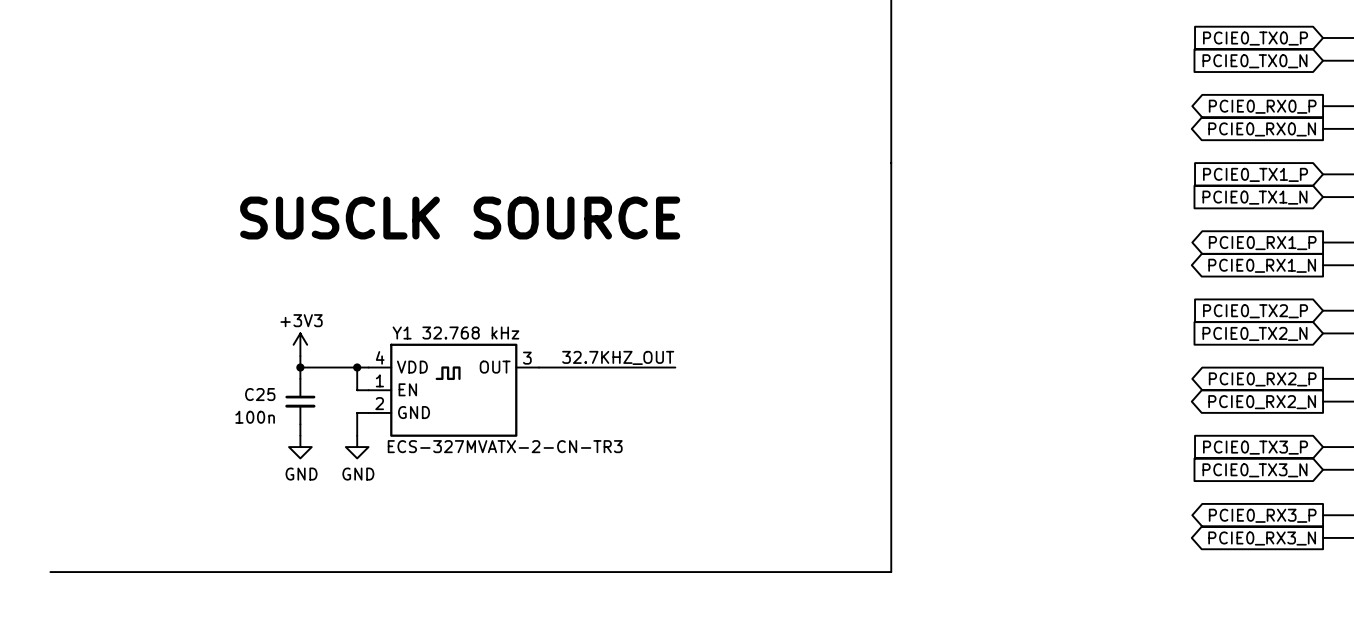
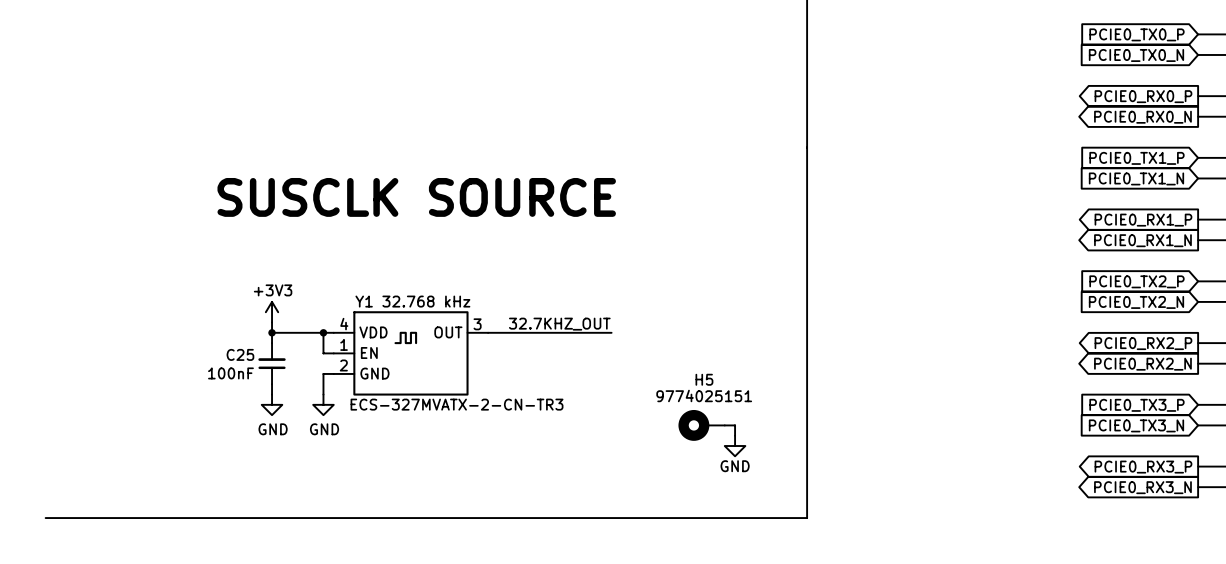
C25 rotation: 0° (300, 401) -> 180° (272, 363)
C25 value: none -> 100nF (230, 373)
C25 text: 100n (255, 417) -> none
Y1 value: none -> ECS-327MVATX-2-CN-TR3 (457, 404)
Y1 text: ECS-327MVATX-2-CN-TR3 (505, 446) -> none
H5: none -> 9774025151 (701, 425)
wire: none -> (724, 425) (735, 425) (735, 435)
power symbol: none -> GND (735, 446)

